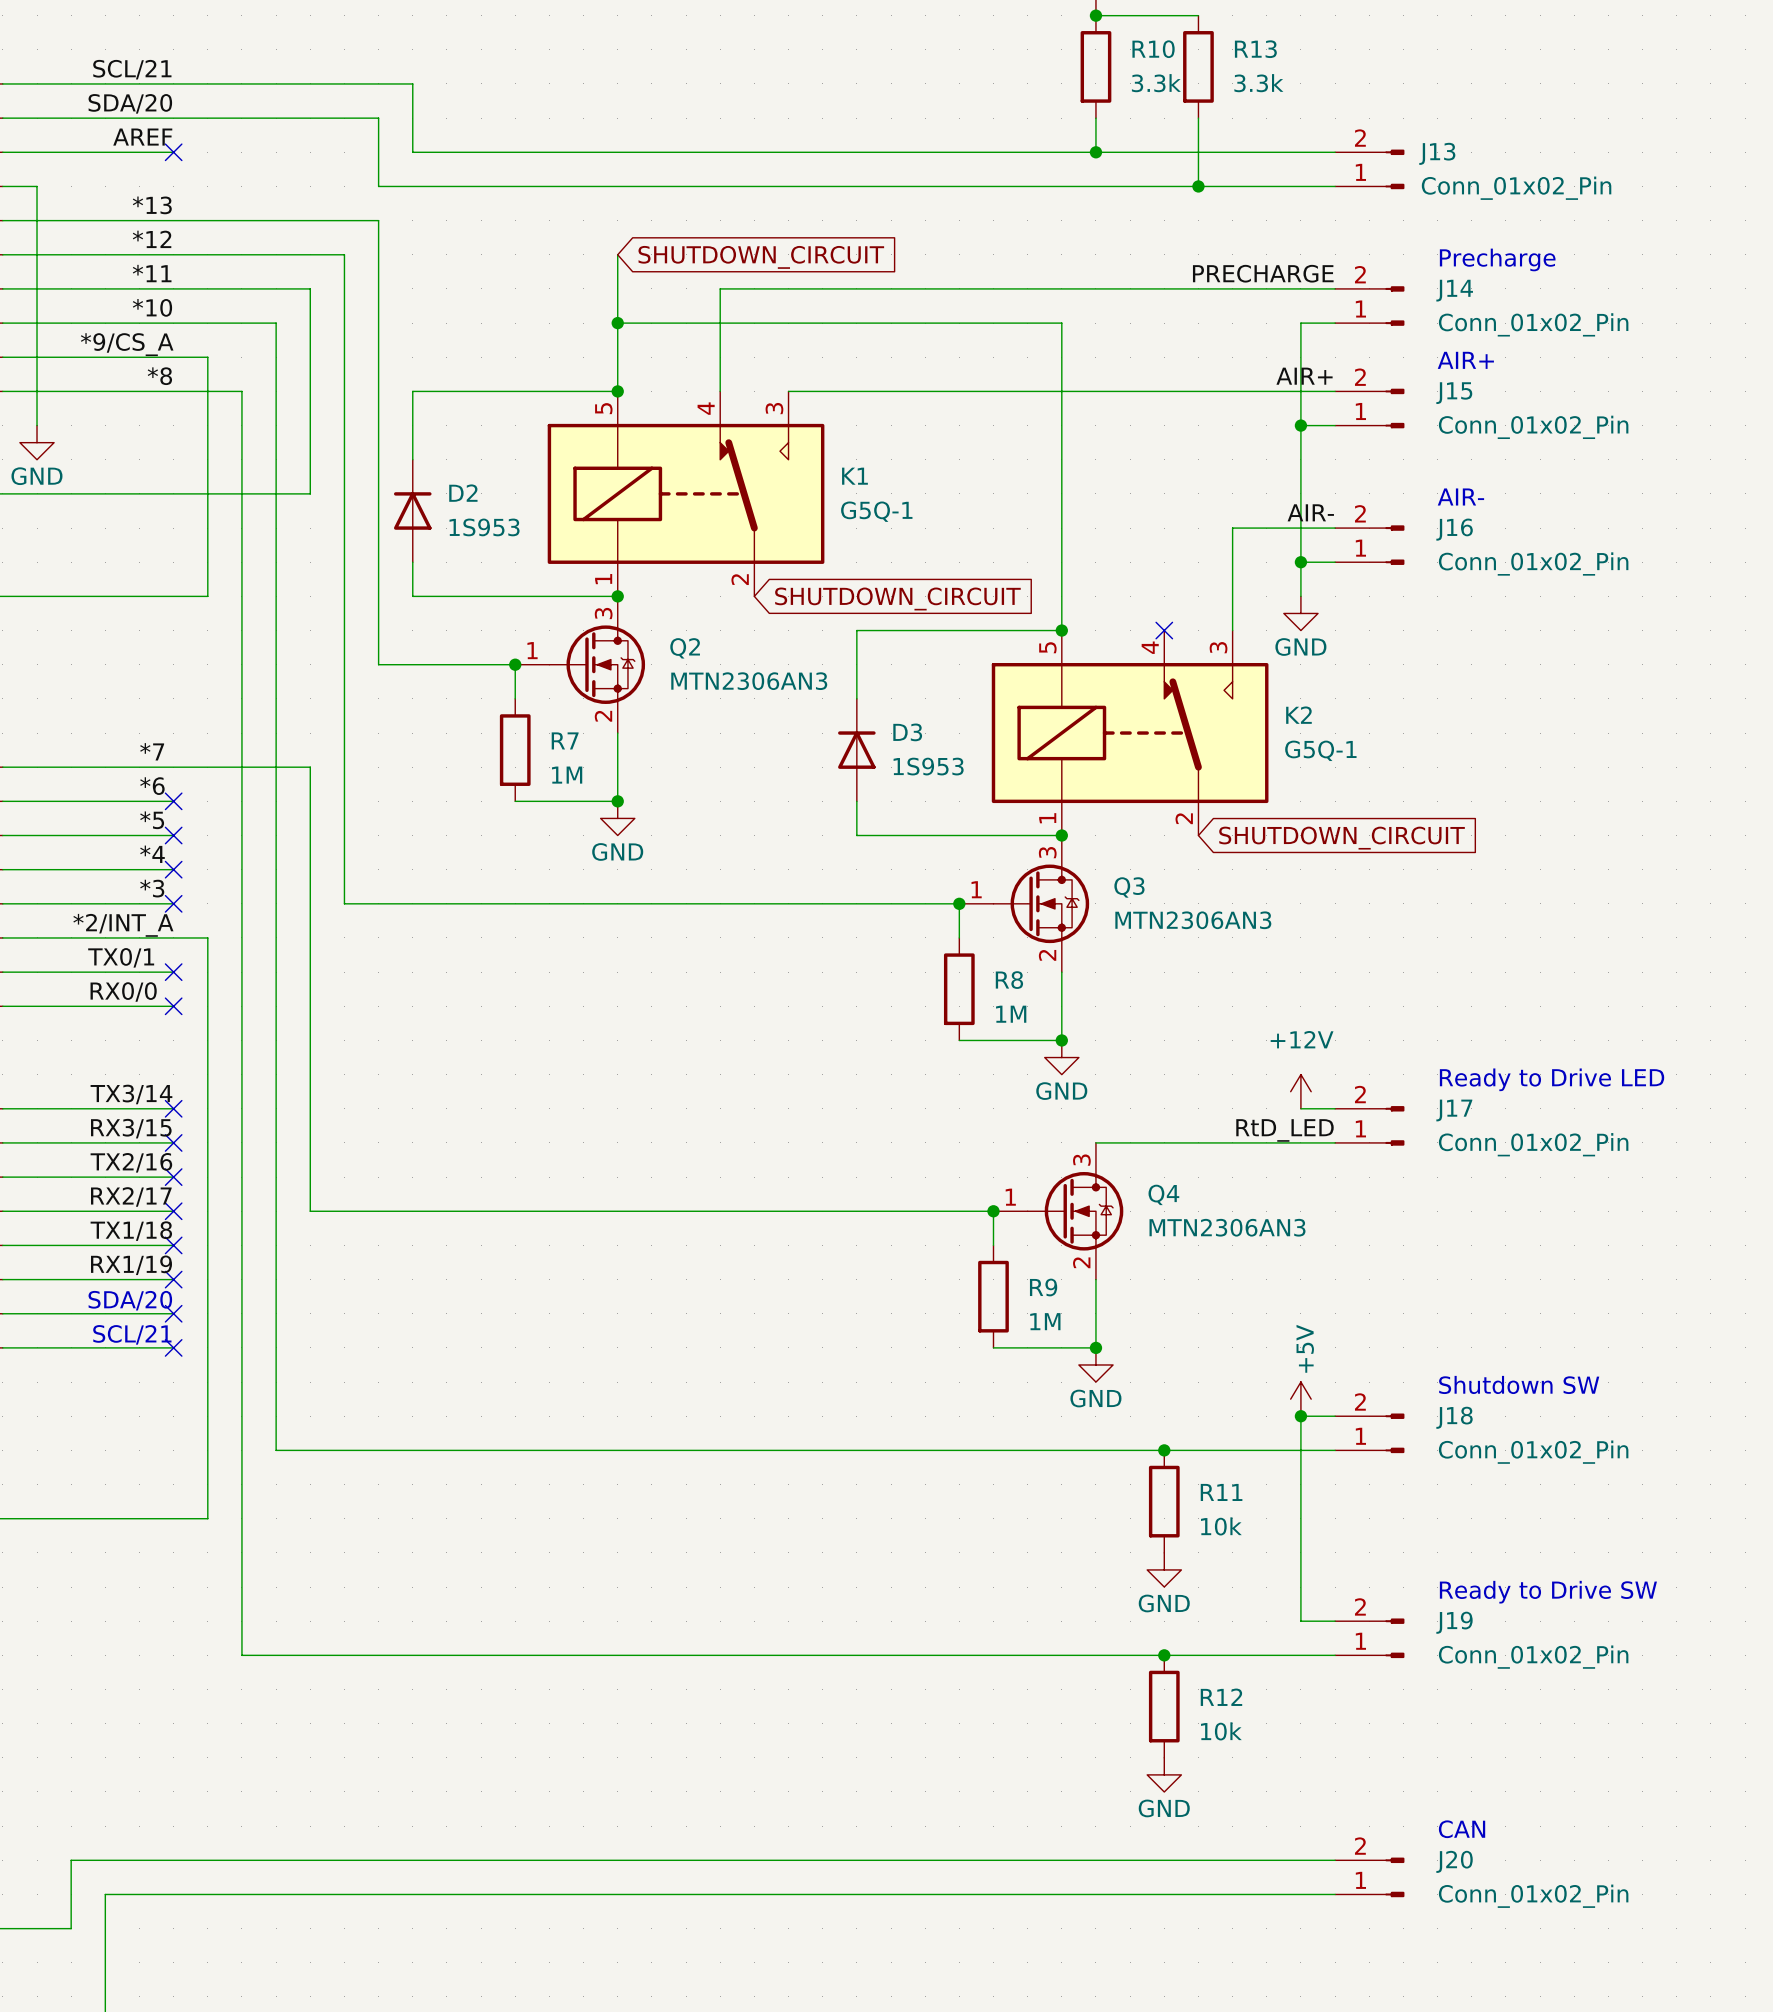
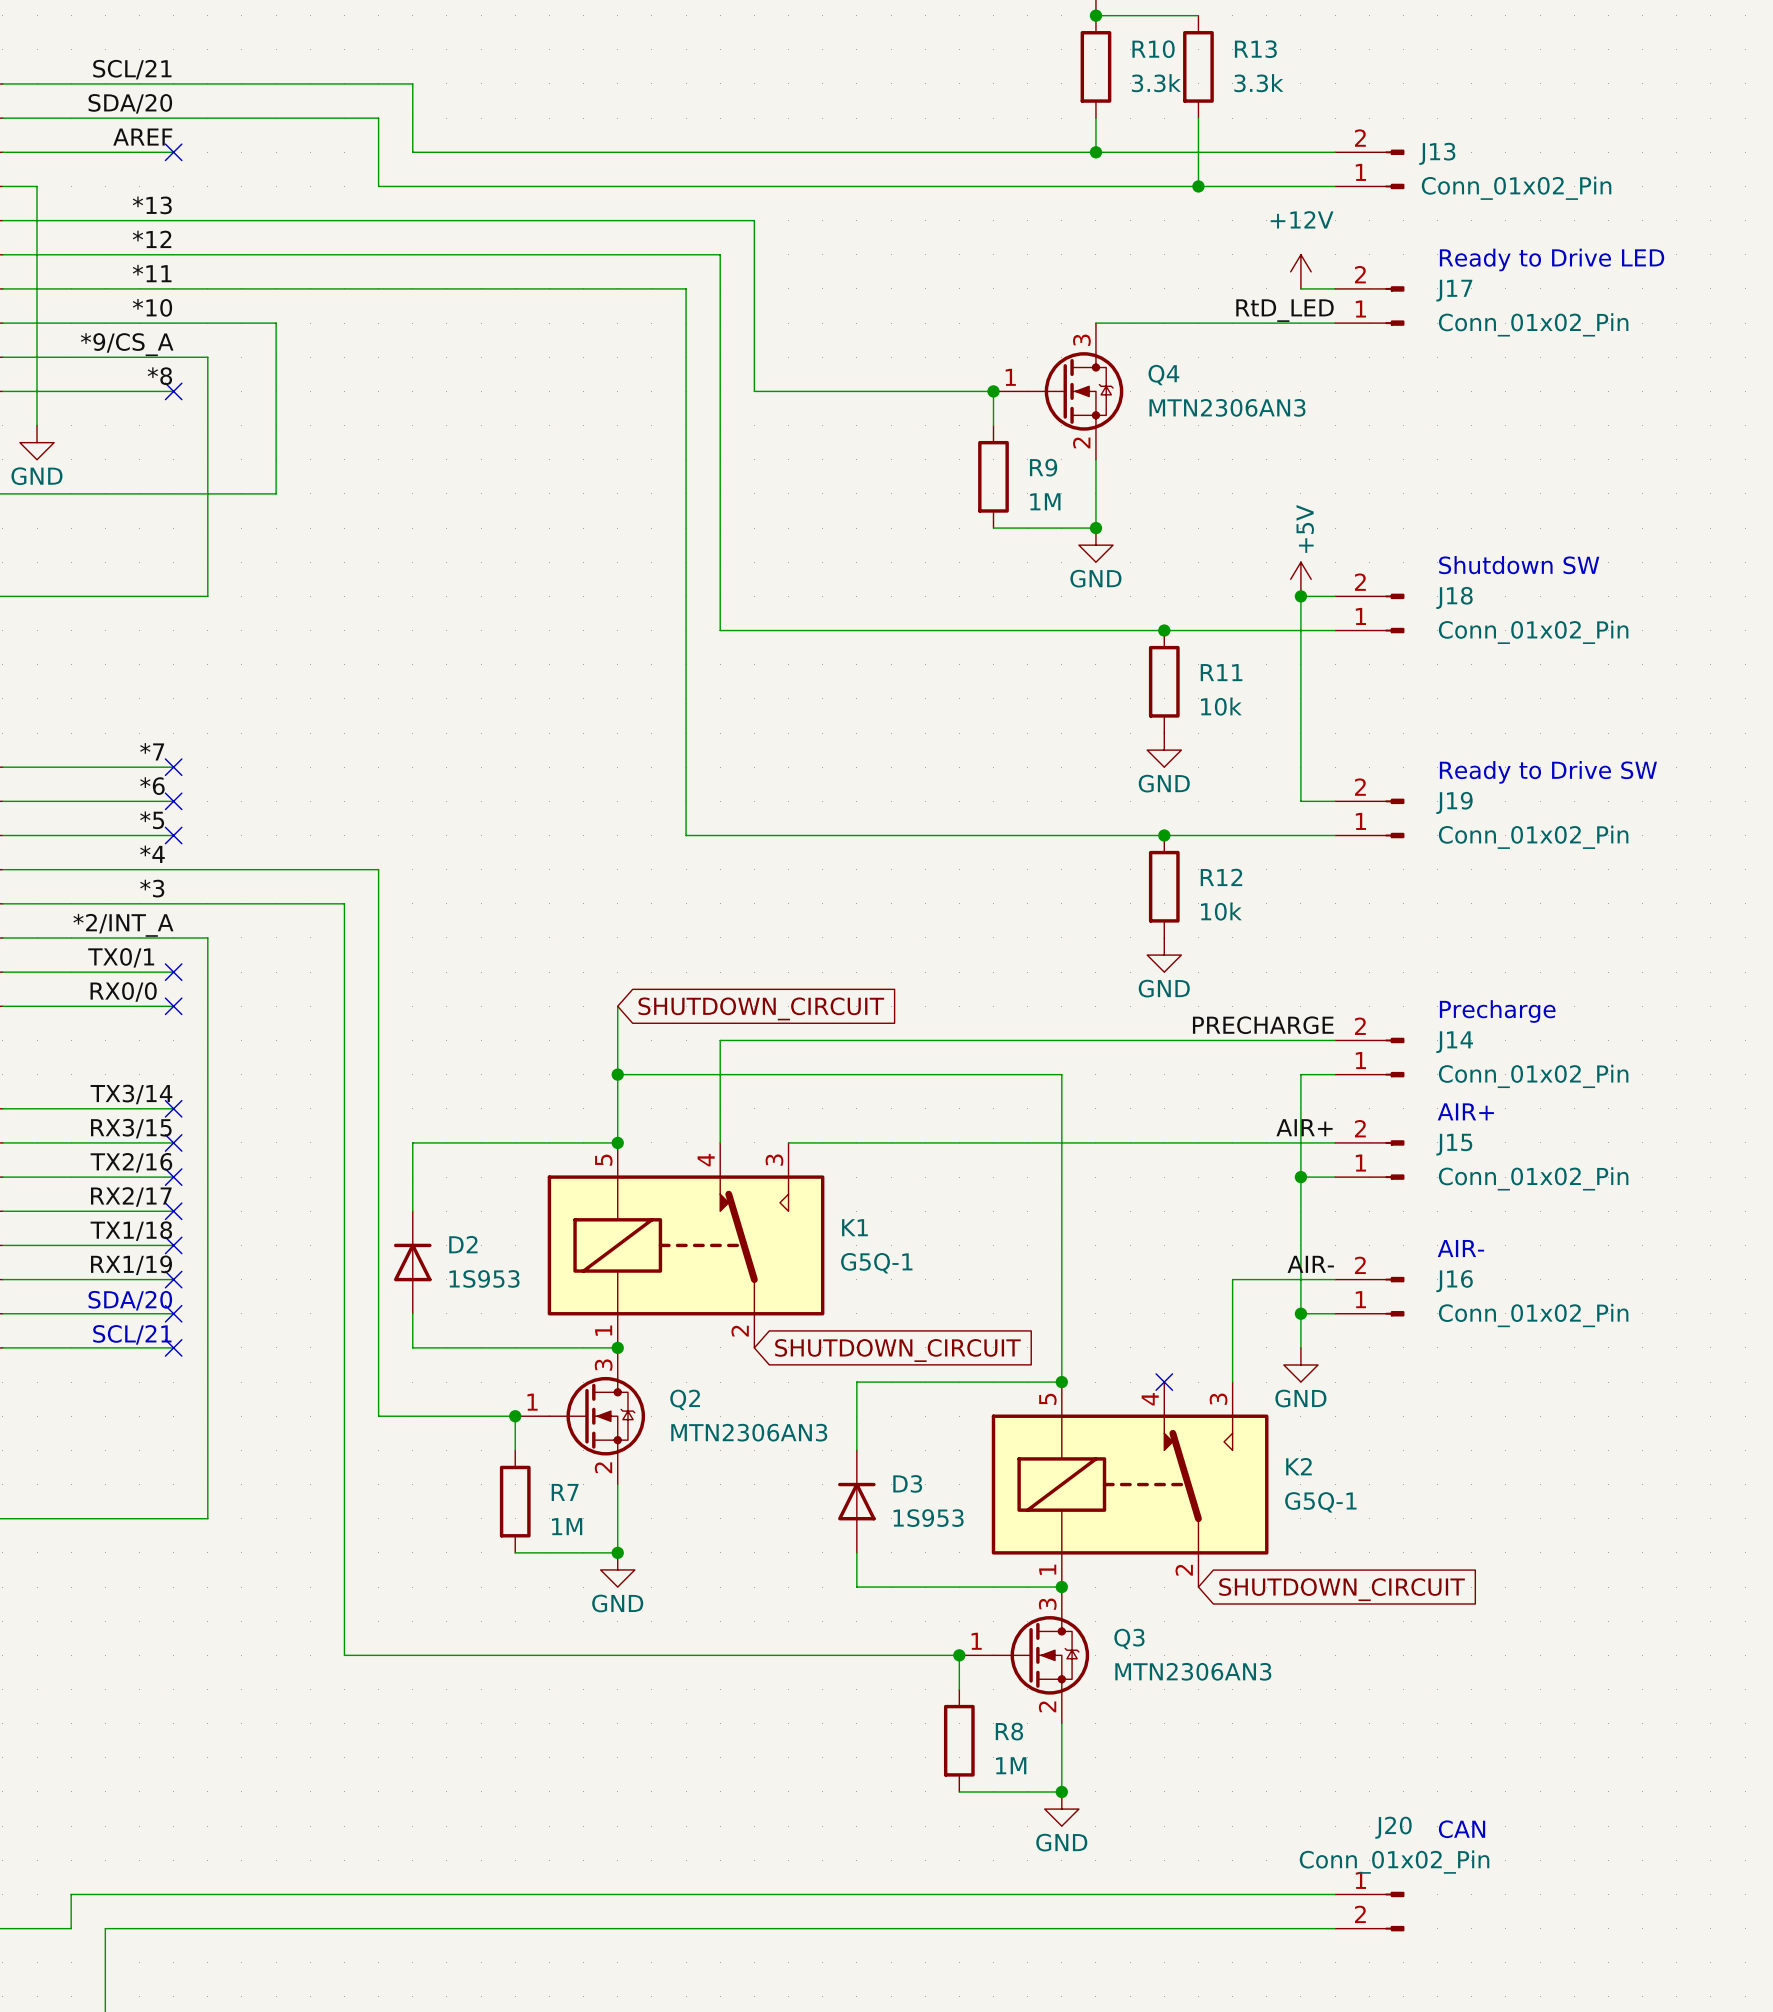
wire: (378, 220) (378, 664) (515, 664) (515, 698) -> (378, 220) (754, 220) (754, 391) (788, 391)
wire: (344, 254) (344, 903) (959, 903) (959, 937) -> (344, 254) (720, 254) (720, 288)
wire: (617, 254) (617, 391) (412, 391) (412, 459) -> none
global label: SHUTDOWN_CIRCUIT (761, 257) -> none
text: Precharge (1497, 259) -> Ready to Drive LED (1552, 259)
power symbol: none -> +12V (1300, 271)
label: PRECHARGE (1263, 273) -> none
wire: (310, 288) (310, 493) (276, 493) (276, 1450) (1335, 1450) -> none
wire: (720, 288) (1300, 288) -> none
J14 name: J14 (1454, 290) -> J17 (1454, 290)
label: none -> RtD_LED (1284, 310)
wire: (617, 323) (1061, 323) (1061, 630) -> (1335, 630) (1061, 630)
junction: (617, 323) -> none
wire: (1300, 323) (1300, 596) -> (1300, 323) (1095, 323)
text: AIR+ (1465, 360) -> none
label: AIR+ (1304, 376) -> none
wire: (173, 391) (241, 391) (241, 1655) (344, 1655) -> (173, 903) (344, 903) (344, 1655)
no-connect mark: none -> (173, 391)
junction: (617, 391) -> none
wire: (993, 391) (1335, 391) -> (993, 391) (993, 425)
junction: none -> (993, 391)
J15 position: (1369, 408) -> (1369, 1160)
wire: (1300, 425) (1335, 425) -> none
junction: (1300, 425) -> none
wire: none -> (1095, 459) (1095, 528) (993, 528)
K1 position: (686, 493) -> (686, 1245)
text: AIR- (1460, 496) -> none
D2 position: (412, 510) -> (412, 1262)
label: AIR- (1310, 512) -> none
junction: none -> (1095, 528)
wire: (1335, 528) (1232, 528) (1232, 630) -> none
power symbol: none -> GND (1095, 545)
J16 position: (1369, 545) -> (1369, 1296)
wire: (412, 562) (412, 596) (617, 596) -> none
wire: (1300, 562) (1335, 562) -> none
junction position: (1300, 562) -> (1300, 596)
text: none -> Shutdown SW (1519, 565)
power symbol: none -> +5V (1300, 579)
junction: (617, 596) -> none
wire: none -> (1335, 596) (1300, 596) (1300, 801) (1335, 801)
global label: SHUTDOWN_CIRCUIT (897, 598) -> none
power symbol: GND (1300, 613) -> none
wire: (856, 630) (856, 698) -> (856, 630) (720, 630) (720, 391)
junction: (1061, 630) -> none
junction: none -> (1164, 630)
no-connect mark: (1164, 630) -> none
junction: (515, 664) -> none
Q2 position: (580, 664) -> (580, 1416)
wire: (617, 733) (617, 801) (515, 801) -> none
K2 position: (1130, 733) -> (1130, 1484)
R7 position: (515, 750) -> (515, 1501)
D3 position: (856, 750) -> (856, 1501)
power symbol: none -> GND (1164, 750)
wire: (173, 767) (310, 767) (310, 1211) (993, 1211) (993, 1245) -> none
no-connect mark: none -> (173, 767)
text: none -> Ready to Drive SW (1548, 772)
junction: (617, 801) -> none
wire: (856, 801) (856, 835) -> (310, 288) (686, 288) (686, 835) (856, 835)
power symbol: GND (617, 818) -> none
wire: none -> (1061, 835) (1335, 835)
junction: (1061, 835) -> none
junction: none -> (1164, 835)
global label: SHUTDOWN_CIRCUIT (1342, 838) -> none
wire: none -> (173, 869) (378, 869) (378, 1416) (515, 1416) (515, 1450)
no-connect mark: (173, 869) -> none
no-connect mark: (173, 903) -> none
junction: (959, 903) -> none
Q3 position: (1024, 903) -> (1024, 1655)
wire: (1061, 972) (1061, 1040) -> (1335, 1040) (1061, 1040)
R8 position: (959, 989) -> (959, 1740)
wire: none -> (617, 1006) (617, 1142) (412, 1142) (412, 1211)
global label: none -> SHUTDOWN_CIRCUIT (761, 1008)
text: none -> Precharge (1497, 1011)
label: none -> PRECHARGE (1263, 1025)
wire: none -> (959, 1040) (720, 1040) (720, 1142)
junction: (1061, 1040) -> none
power symbol position: GND (1061, 1057) -> GND (1164, 955)
J14: none -> Conn_01x02_Pin (1369, 1057)
wire: none -> (617, 1074) (1061, 1074) (1061, 1382) (856, 1382) (856, 1450)
junction: none -> (617, 1074)
wire: none -> (1335, 1074) (1300, 1074) (1300, 1347)
text: Ready to Drive LED (1552, 1079) -> none
power symbol: +12V (1300, 1091) -> none
wire: (1300, 1108) (1335, 1108) -> (1300, 1177) (1335, 1177)
text: none -> AIR+ (1465, 1111)
J17: Conn_01x02_Pin (1369, 1125) -> none
label: RtD_LED (1284, 1130) -> AIR+ (1304, 1127)
junction: none -> (617, 1142)
wire: none -> (788, 1142) (1095, 1142)
junction: none -> (1300, 1177)
junction: (993, 1211) -> none
Q4 position: (1058, 1211) -> (1058, 391)
text: none -> AIR- (1460, 1248)
label: none -> AIR- (1310, 1264)
wire: (1095, 1279) (1095, 1347) (993, 1347) -> none
wire: none -> (1335, 1279) (1232, 1279) (1232, 1382)
R9 position: (993, 1296) -> (993, 476)
wire: none -> (412, 1313) (412, 1347) (617, 1347)
wire: none -> (1300, 1313) (1335, 1313)
junction: none -> (1300, 1313)
junction: none -> (617, 1347)
junction position: (1095, 1347) -> (1061, 1382)
global label: none -> SHUTDOWN_CIRCUIT (897, 1350)
power symbol: GND (1095, 1364) -> none
power symbol: none -> GND (1300, 1364)
no-connect mark: none -> (1164, 1382)
text: Shutdown SW (1519, 1384) -> none
power symbol: +5V (1300, 1399) -> none
junction: none -> (515, 1416)
junction: (1300, 1416) -> none
wire: (1335, 1416) (1300, 1416) (1300, 1621) (1335, 1621) -> none
J18 position: (1369, 1433) -> (1369, 613)
junction: (1164, 1450) -> none
wire: none -> (617, 1484) (617, 1552) (515, 1552)
R11 position: (1164, 1501) -> (1164, 681)
junction: none -> (617, 1552)
wire: none -> (856, 1552) (856, 1587) (1061, 1587)
power symbol: none -> GND (617, 1569)
power symbol: GND (1164, 1569) -> none
junction: none -> (1061, 1587)
global label: none -> SHUTDOWN_CIRCUIT (1342, 1589)
text: Ready to Drive SW (1548, 1592) -> none
J19 position: (1369, 1638) -> (1369, 818)
wire: (959, 1655) (1335, 1655) -> (959, 1655) (959, 1689)
junction: none -> (959, 1655)
junction: (1164, 1655) -> none
R12 position: (1164, 1706) -> (1164, 886)
wire: none -> (1061, 1723) (1061, 1791) (959, 1791)
power symbol position: GND (1164, 1774) -> GND (1061, 1809)
junction: none -> (1061, 1791)
wire: (1335, 1860) (71, 1860) (71, 1894) -> none
J20 name position: J20 (1454, 1861) -> J20 (1393, 1827)
J20 flip: as is (1394, 1877) -> up-down (1394, 1911)
wire: (105, 1894) (105, 1928) -> (105, 1894) (71, 1894)
J20 value position: Conn_01x02_Pin (1533, 1896) -> Conn_01x02_Pin (1394, 1862)
wire: none -> (105, 1928) (1335, 1928)

